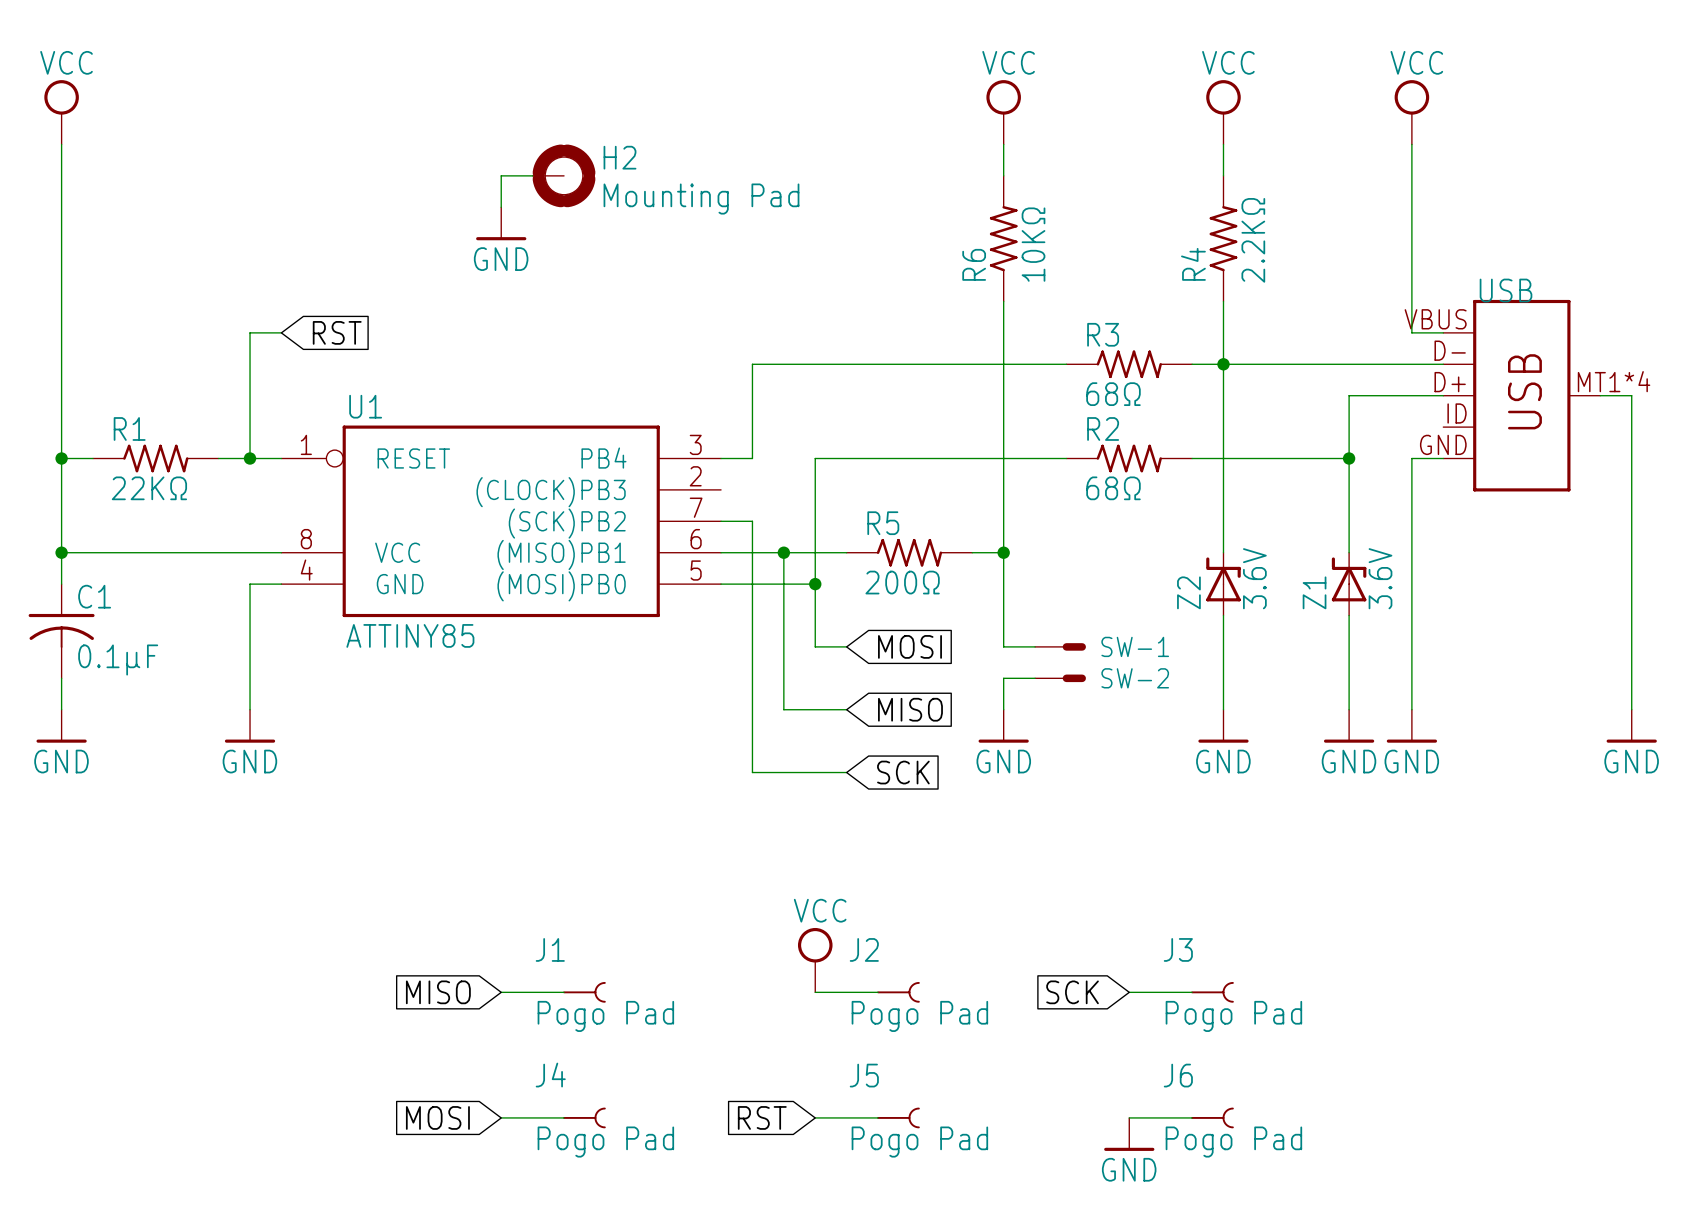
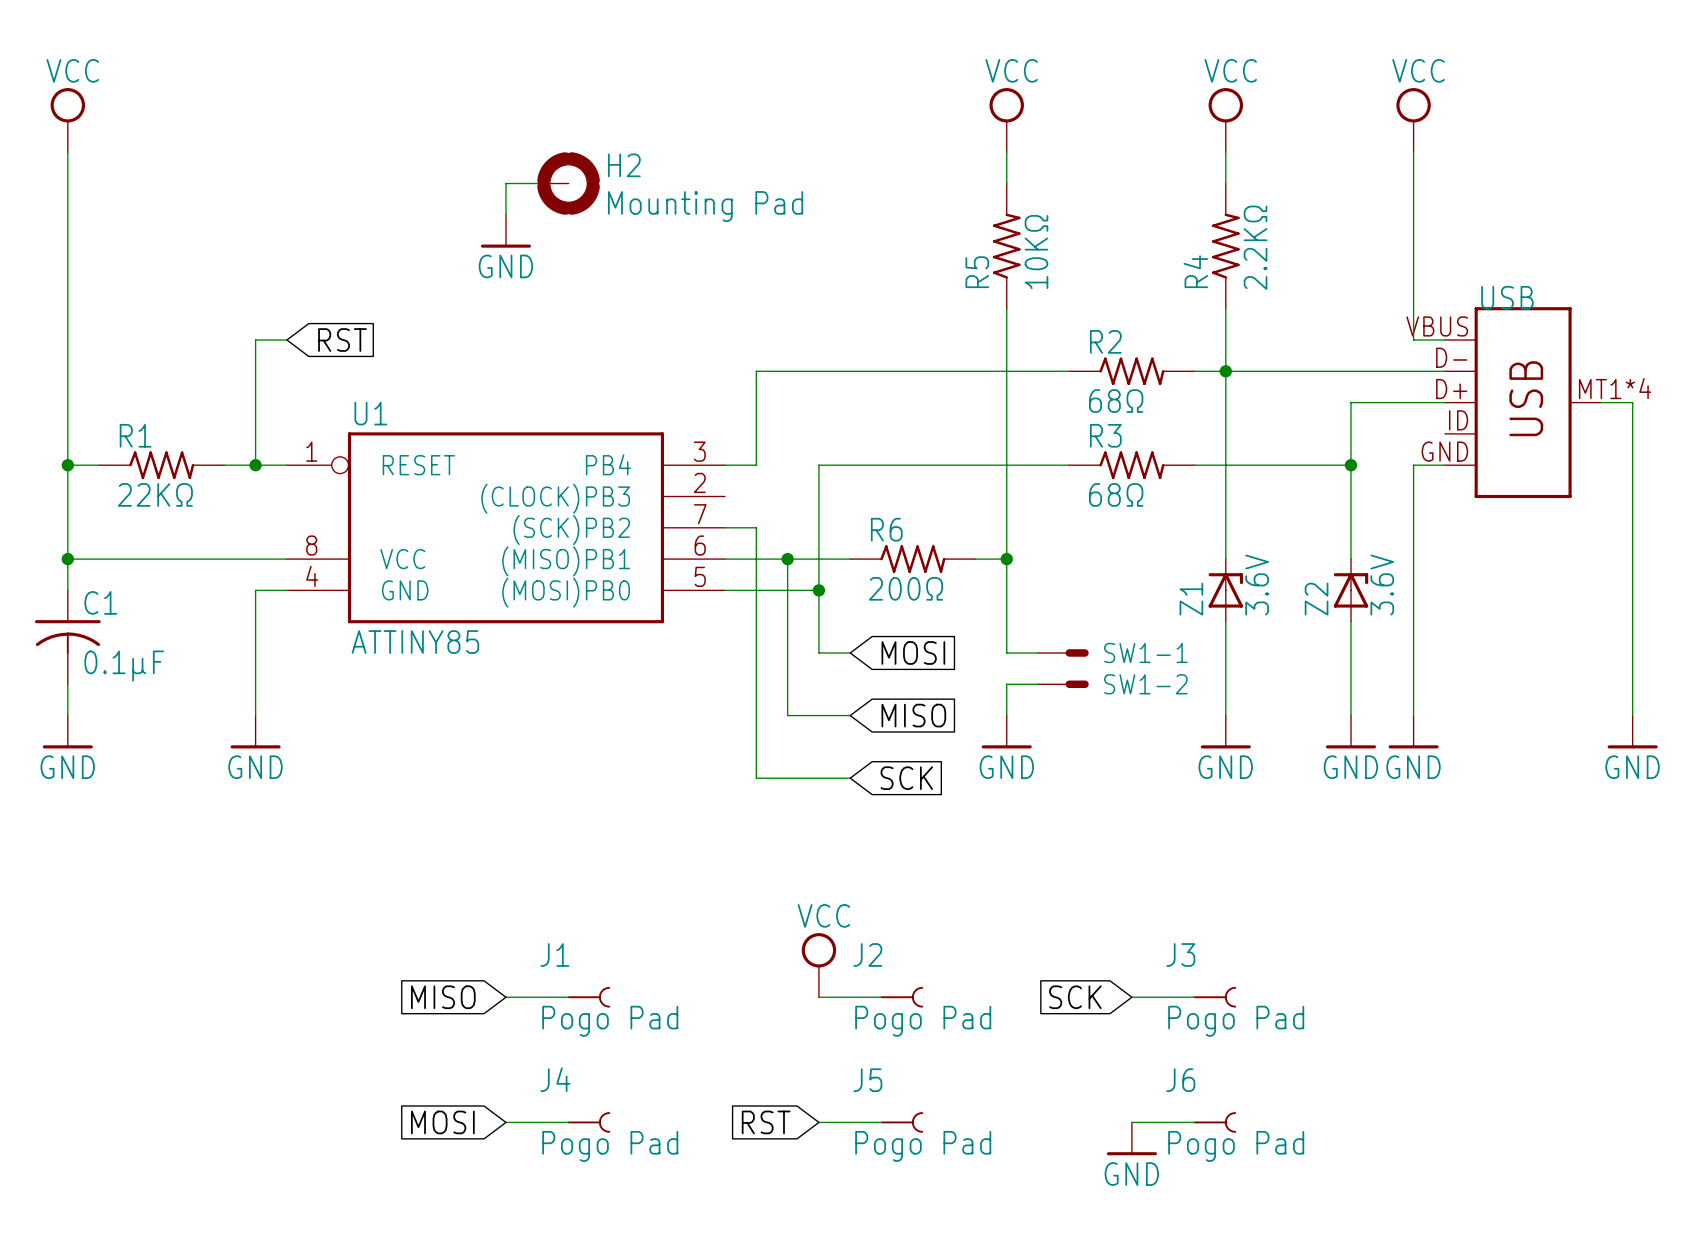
R6 name: R6 (974, 264) -> R5 (977, 272)
R3 name: R3 (1103, 334) -> R2 (1105, 341)
R2 name: R2 (1103, 428) -> R3 (1105, 435)
R5 name: R5 (883, 523) -> R6 (886, 529)
Z2 symbol: [1206, 552, 1241, 616] -> [1333, 559, 1369, 622]
Z1 symbol: [1331, 552, 1367, 616] -> [1208, 559, 1244, 622]
SW-1 name: SW-1 (1135, 646) -> SW1-1 (1145, 652)
SW-2 name: SW-2 (1135, 678) -> SW1-2 (1145, 684)

